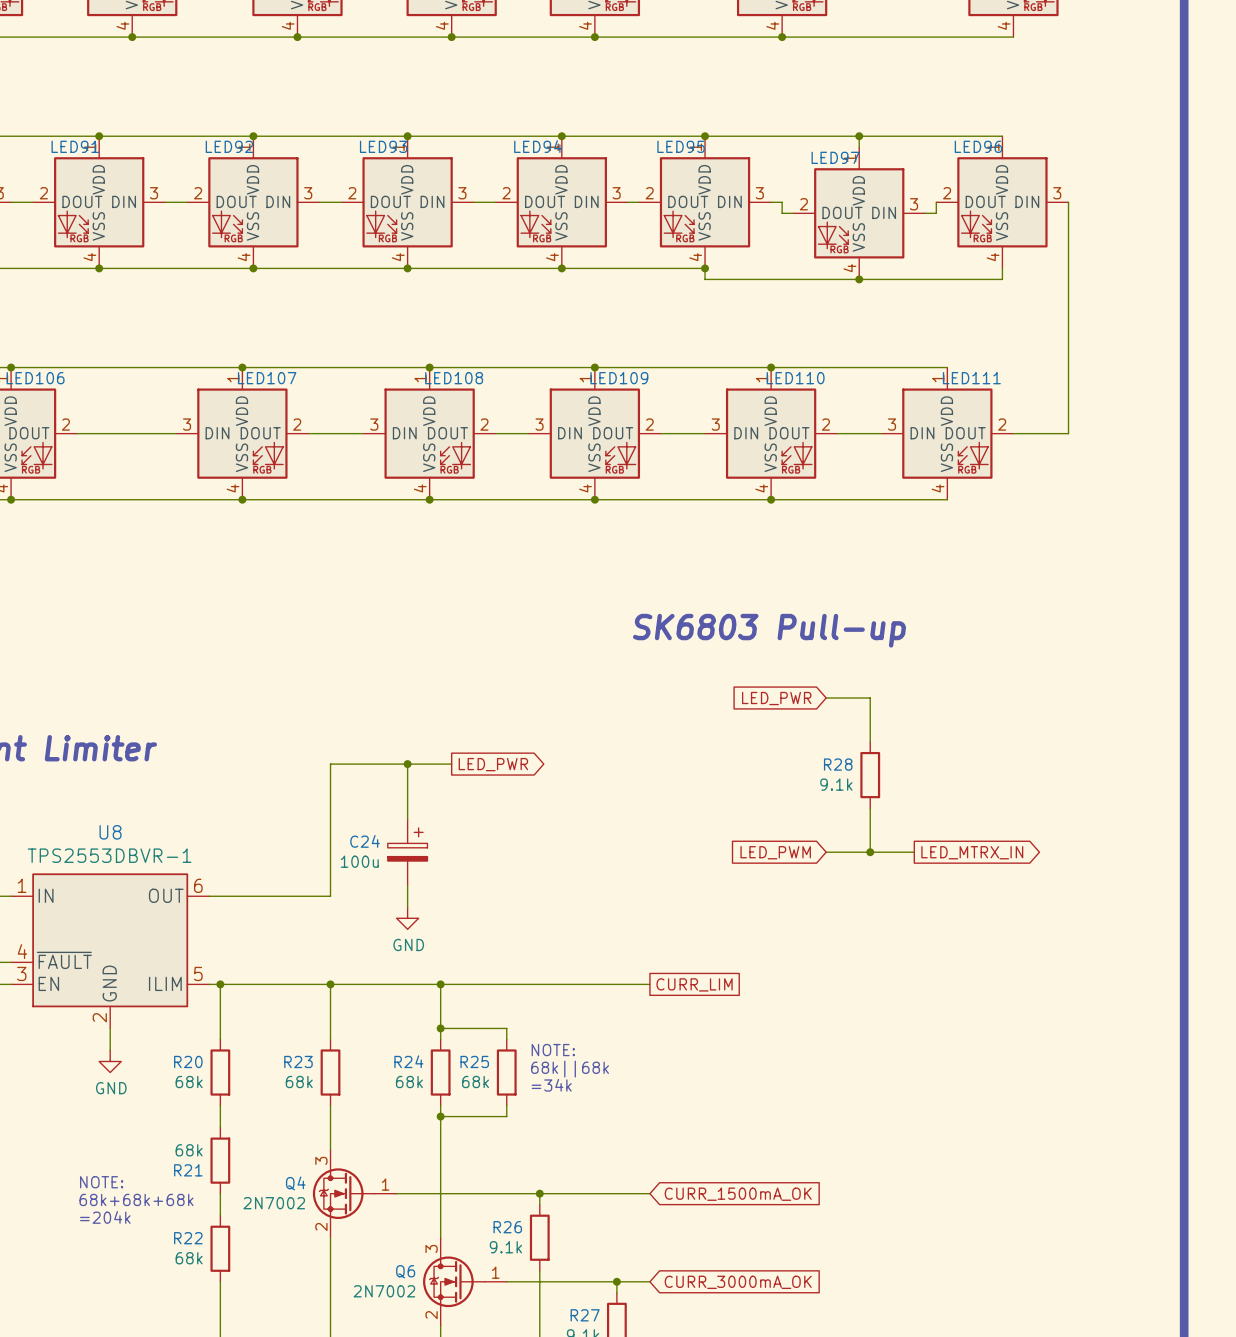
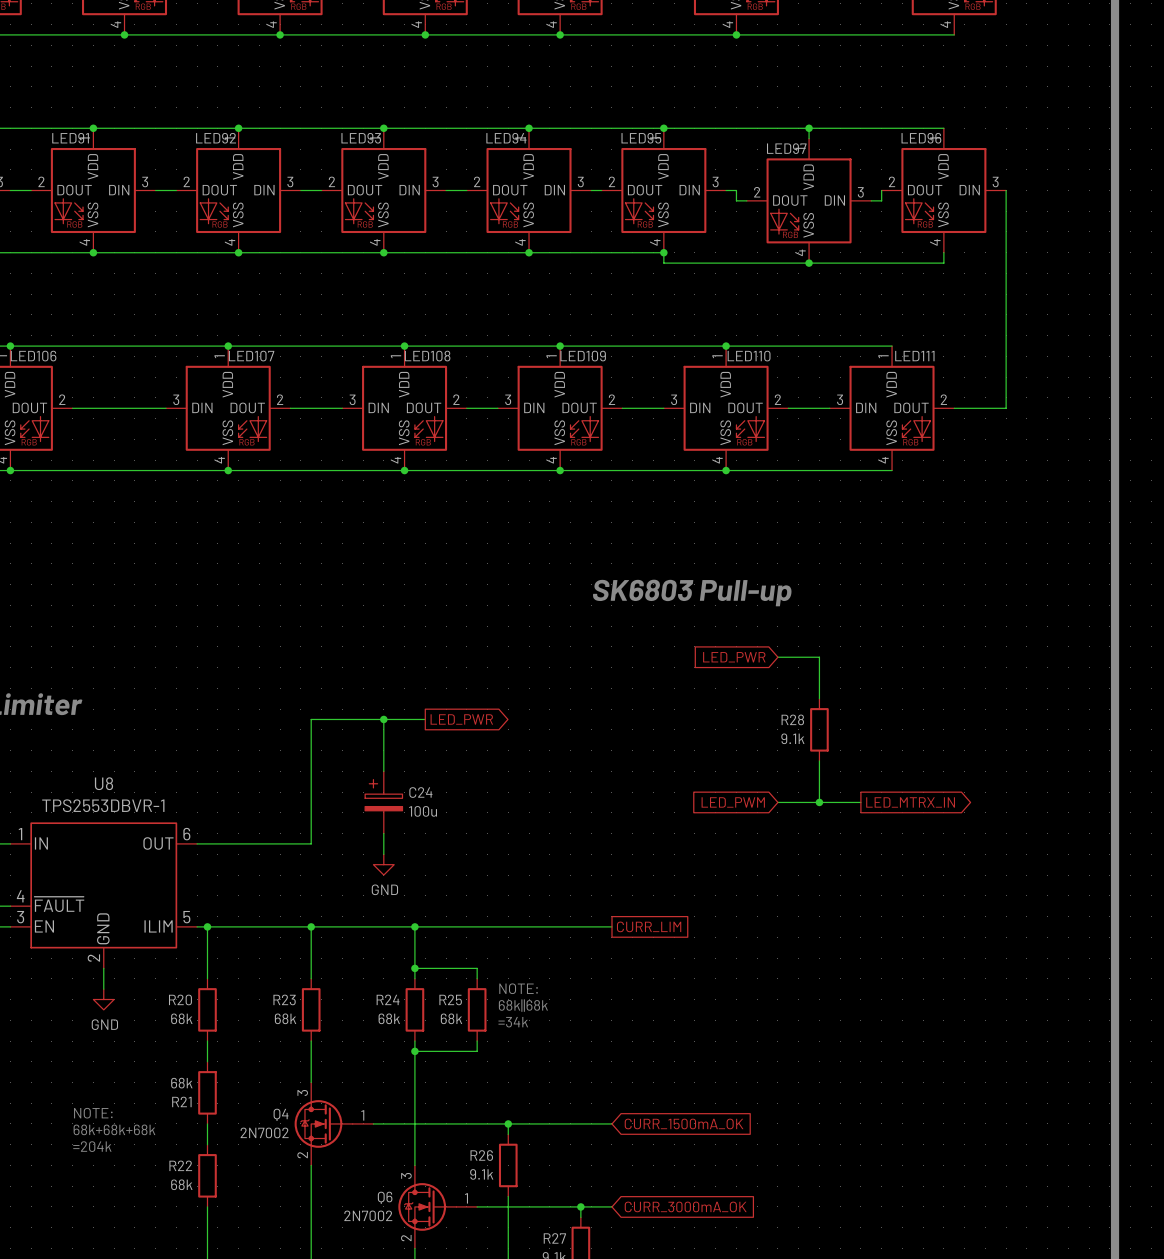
C24 flip: as is (407, 844) -> left-right (383, 795)

